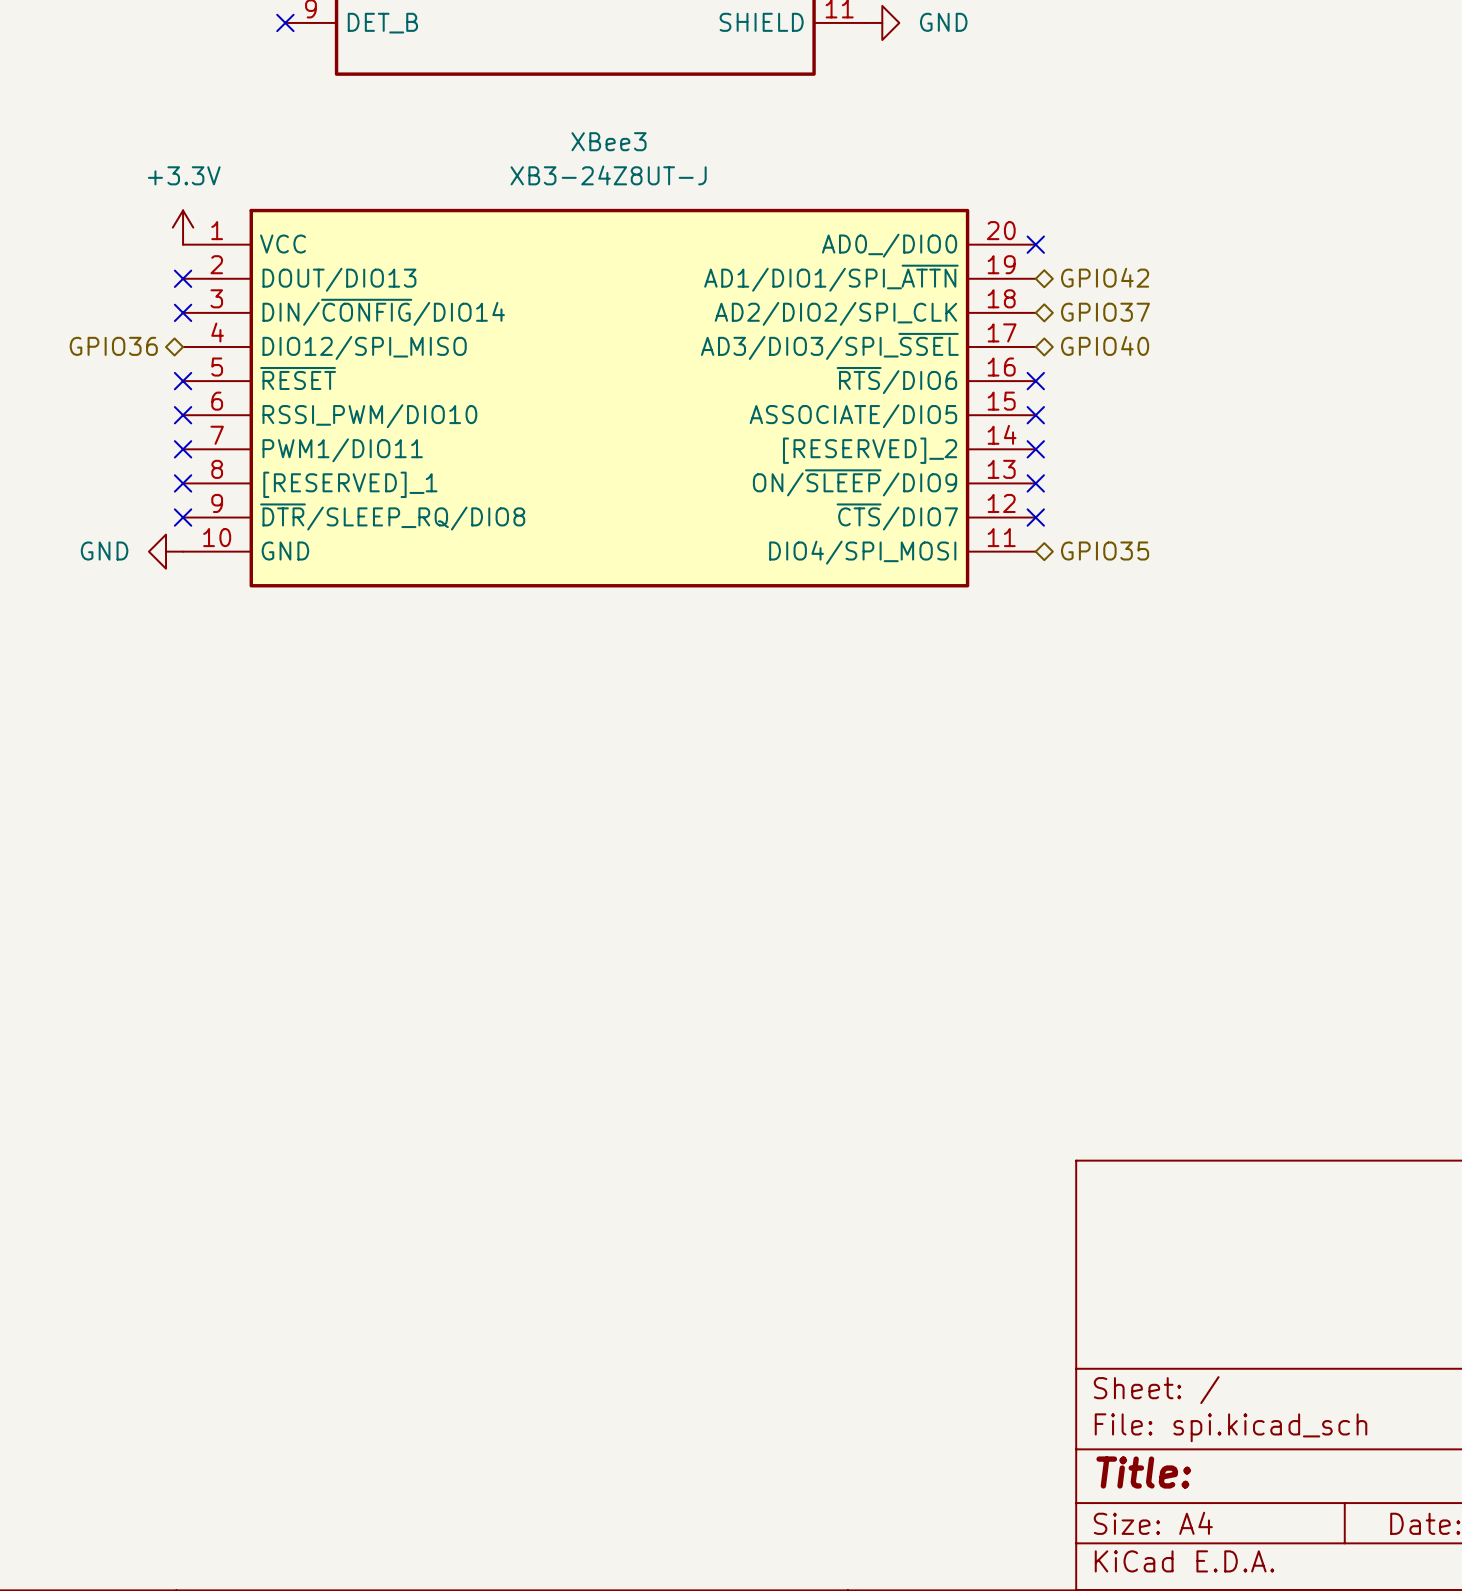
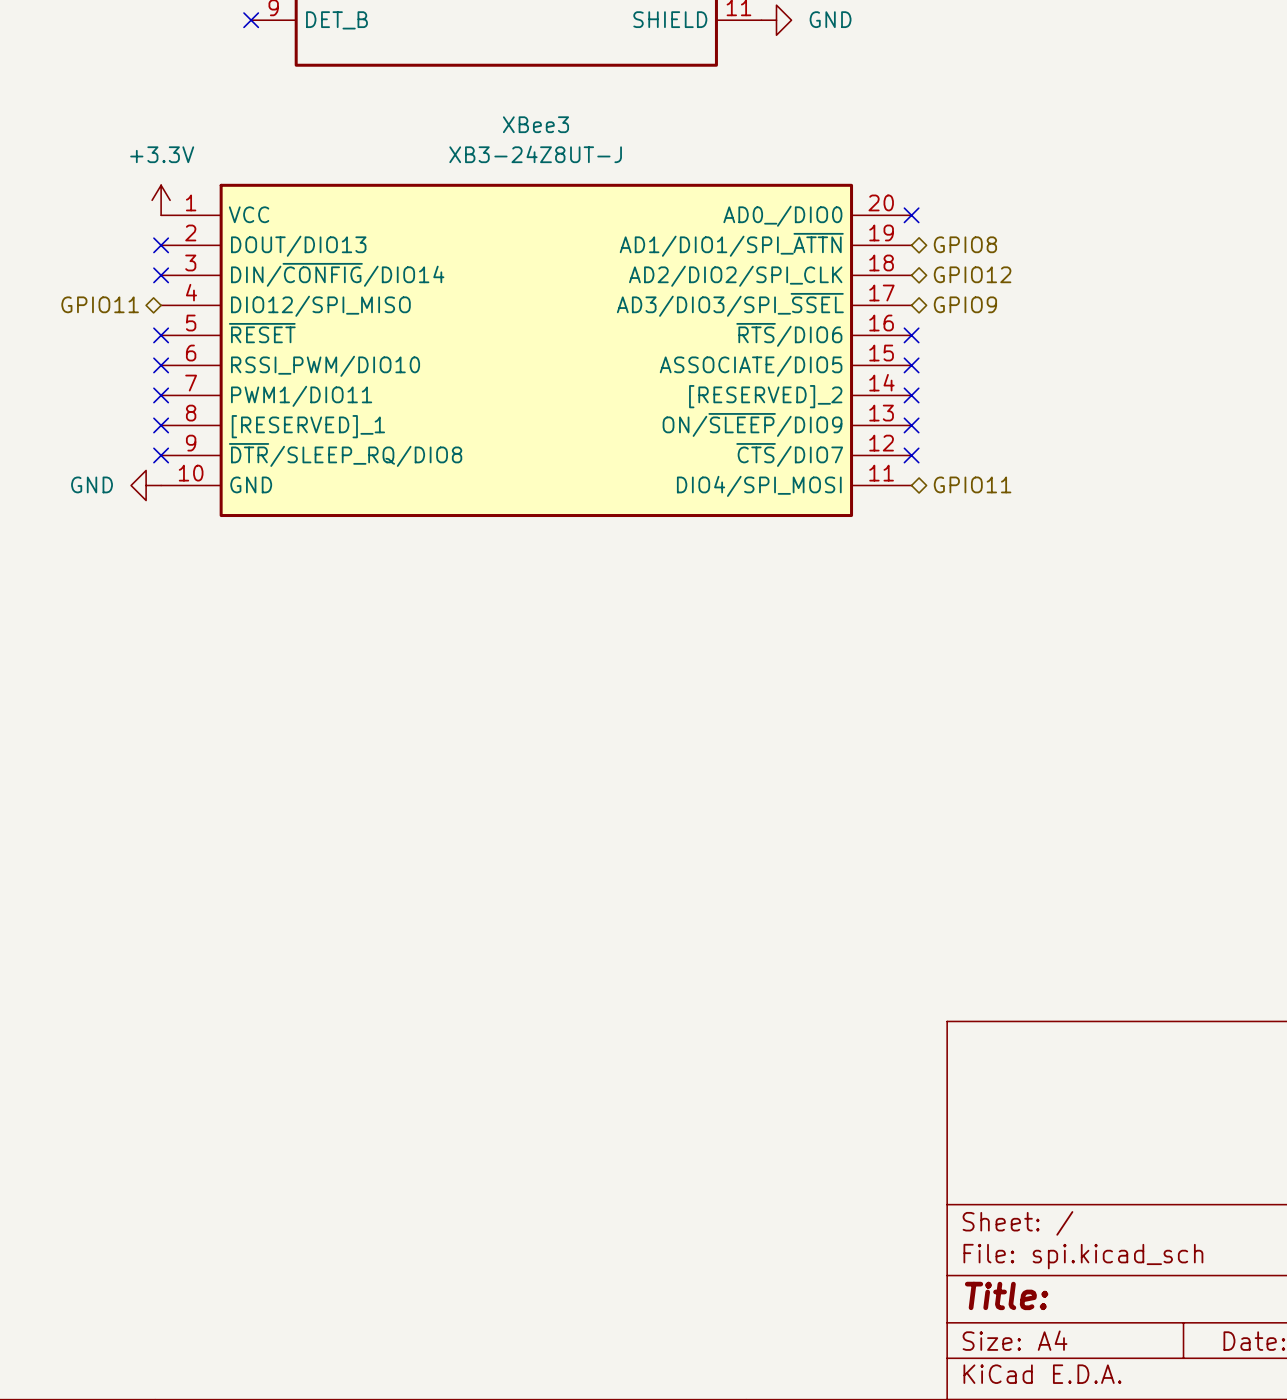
hierarchical label: GPIO42 (1105, 277) -> GPIO8 (965, 244)
hierarchical label: GPIO37 (1105, 312) -> GPIO12 (972, 274)
hierarchical label: GPIO40 (1105, 345) -> GPIO9 (965, 304)
hierarchical label: GPIO36 (113, 346) -> GPIO11 (100, 304)
hierarchical label: GPIO35 (1105, 551) -> GPIO11 (972, 484)

